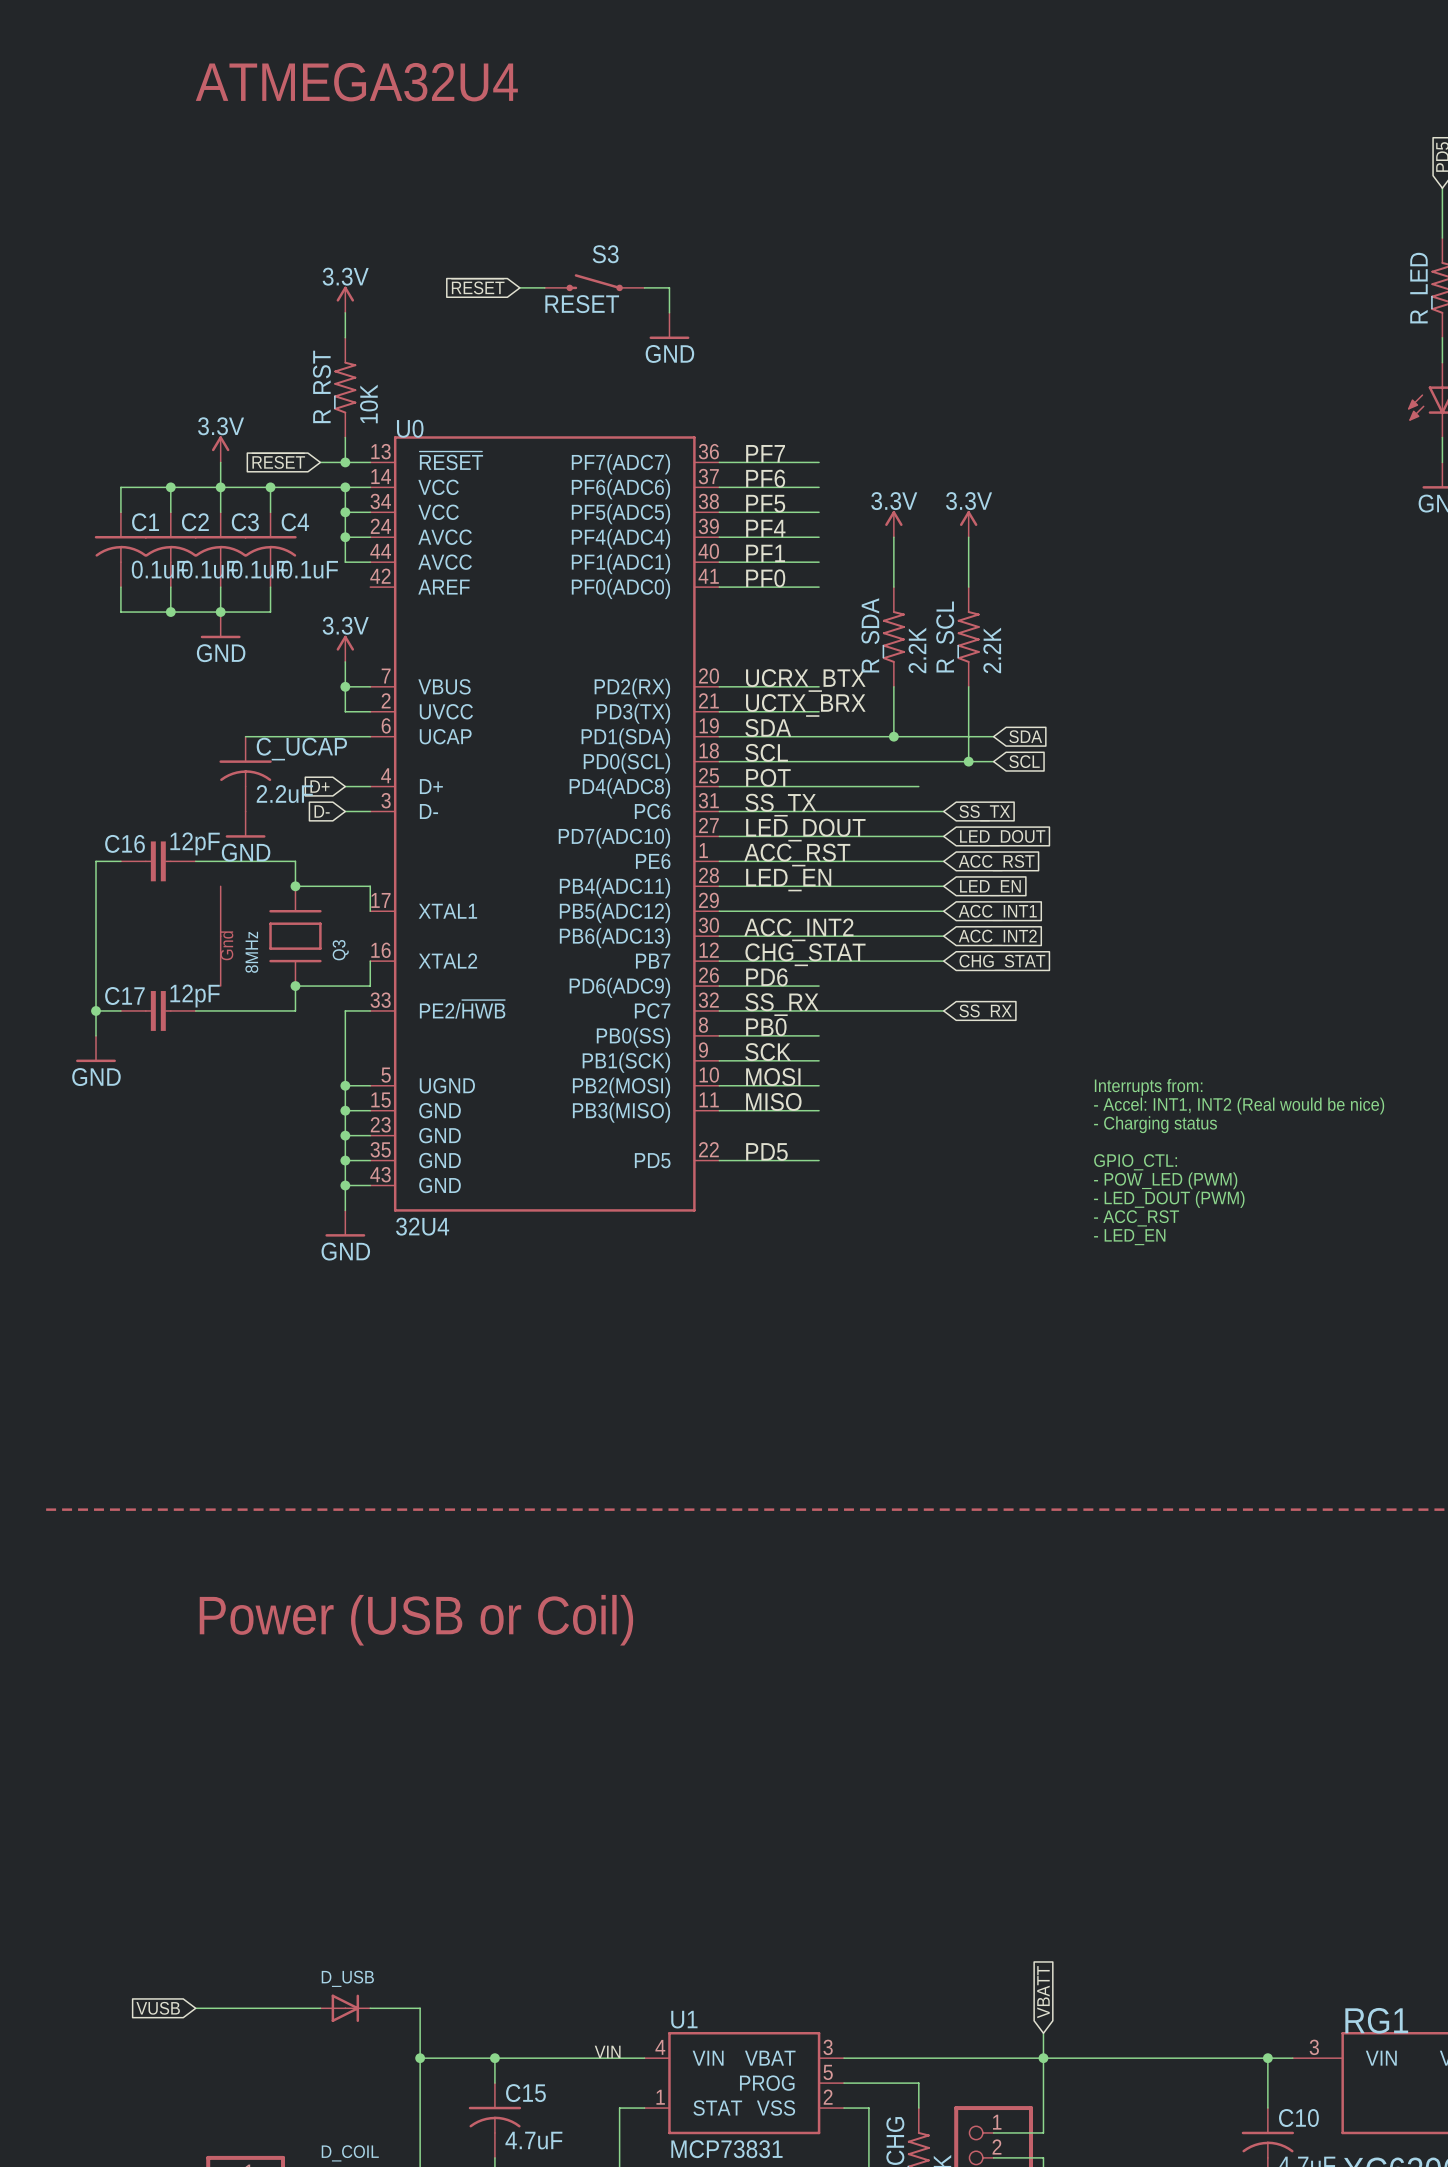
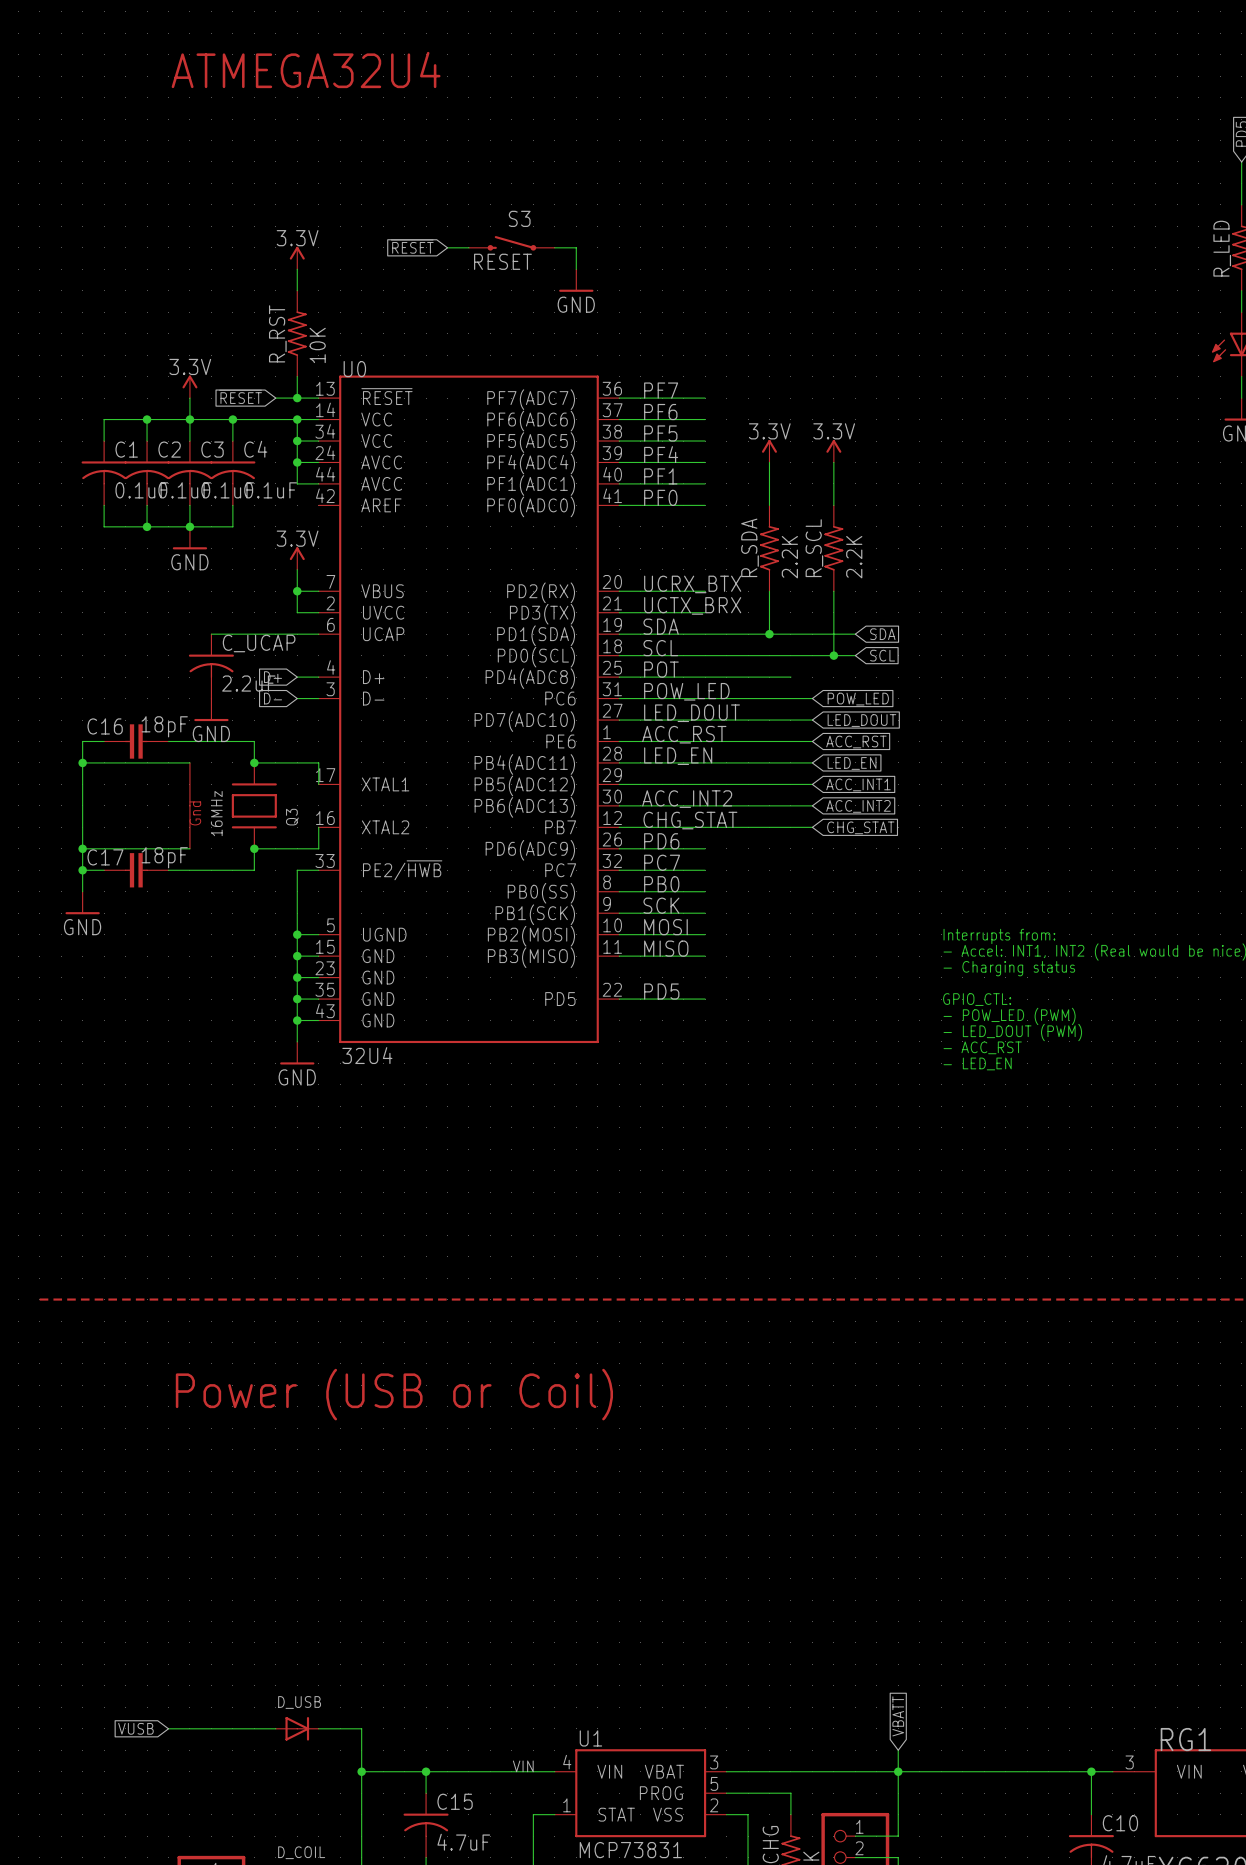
label: SS_TX (780, 805) -> POW_LED (686, 691)
global label: SS_TX (984, 813) -> POW_LED (858, 699)
C16 value: 12pF (195, 843) -> 18pF (164, 726)
wire: none -> (82, 762) (189, 762)
junction: none -> (82, 762)
Q3 value: 8MHz (251, 952) -> 16MHz (216, 813)
wire: none -> (82, 848) (189, 848)
junction: none -> (82, 848)
C17 value: 12pF (195, 996) -> 18pF (164, 857)
label: SS_RX (781, 1004) -> PC7 (662, 862)
wire: (819, 1010) (943, 1010) -> none
global label: SS_RX (985, 1012) -> none

